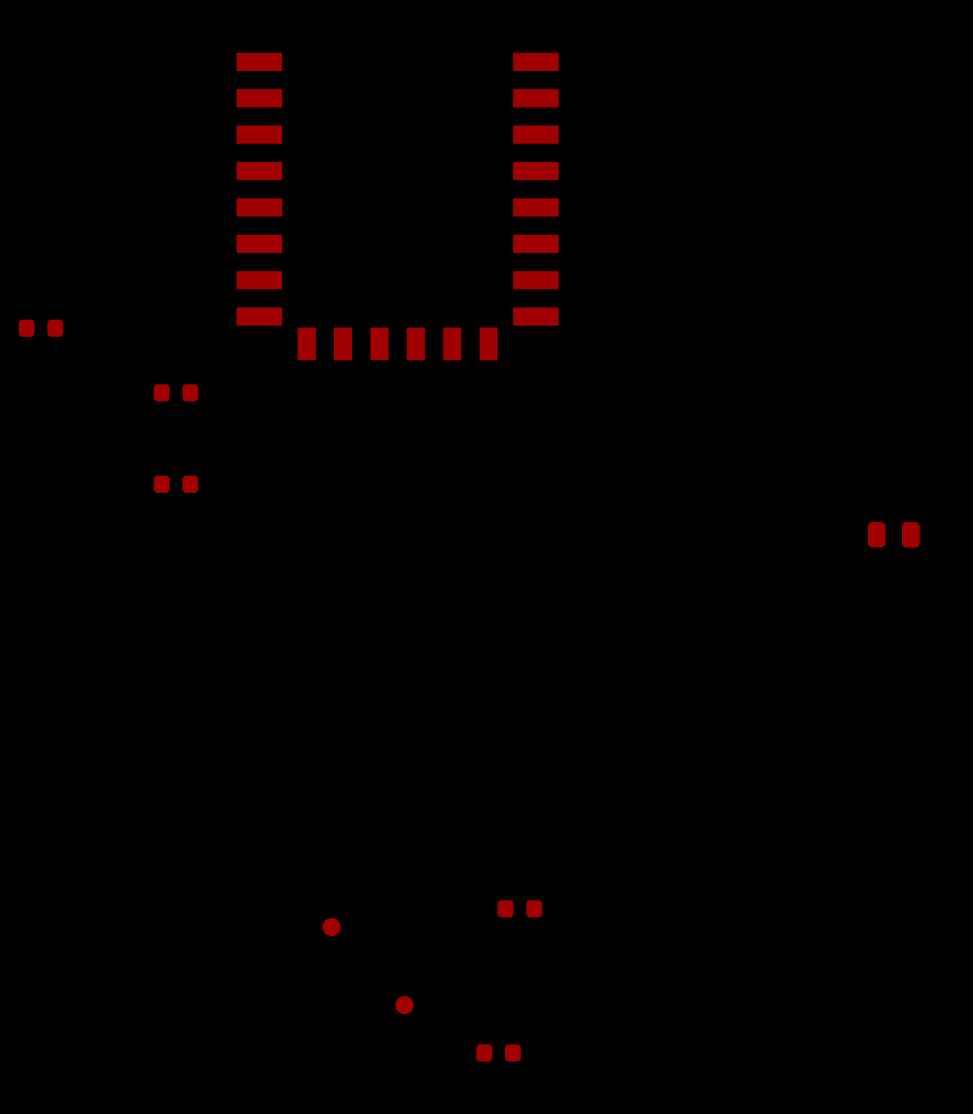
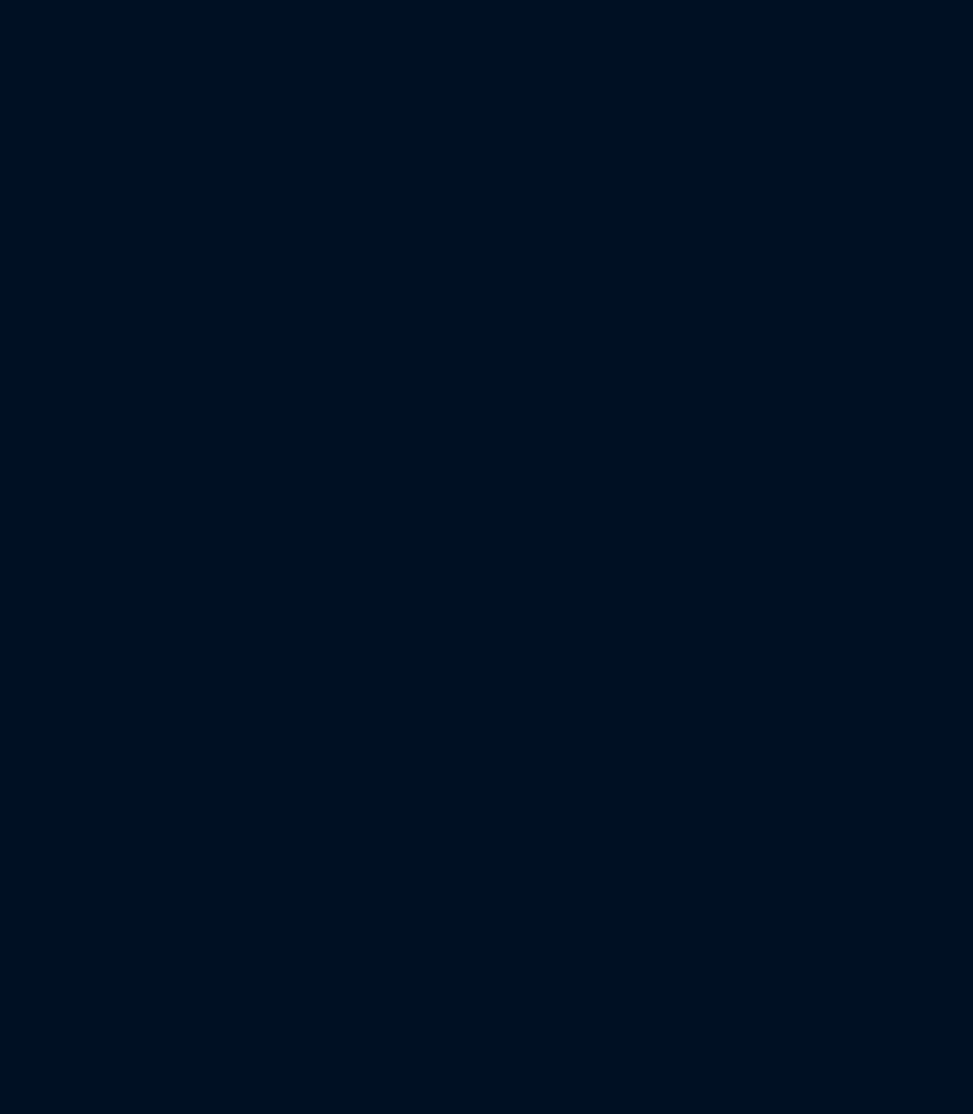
part: (397, 206) -> none
part: (41, 328) -> none
part: (176, 392) -> none
part: (176, 484) -> none
part: (893, 534) -> none
part: (519, 908) -> none
part: (331, 927) -> none
part: (404, 1005) -> none
part: (498, 1052) -> none

